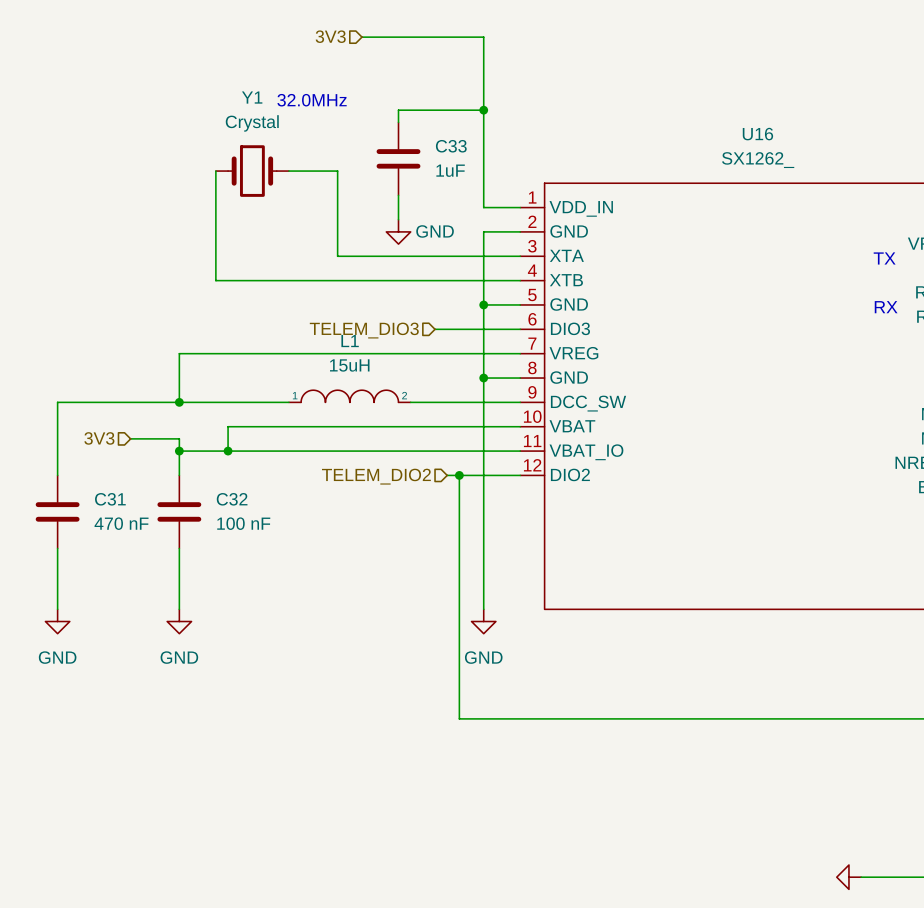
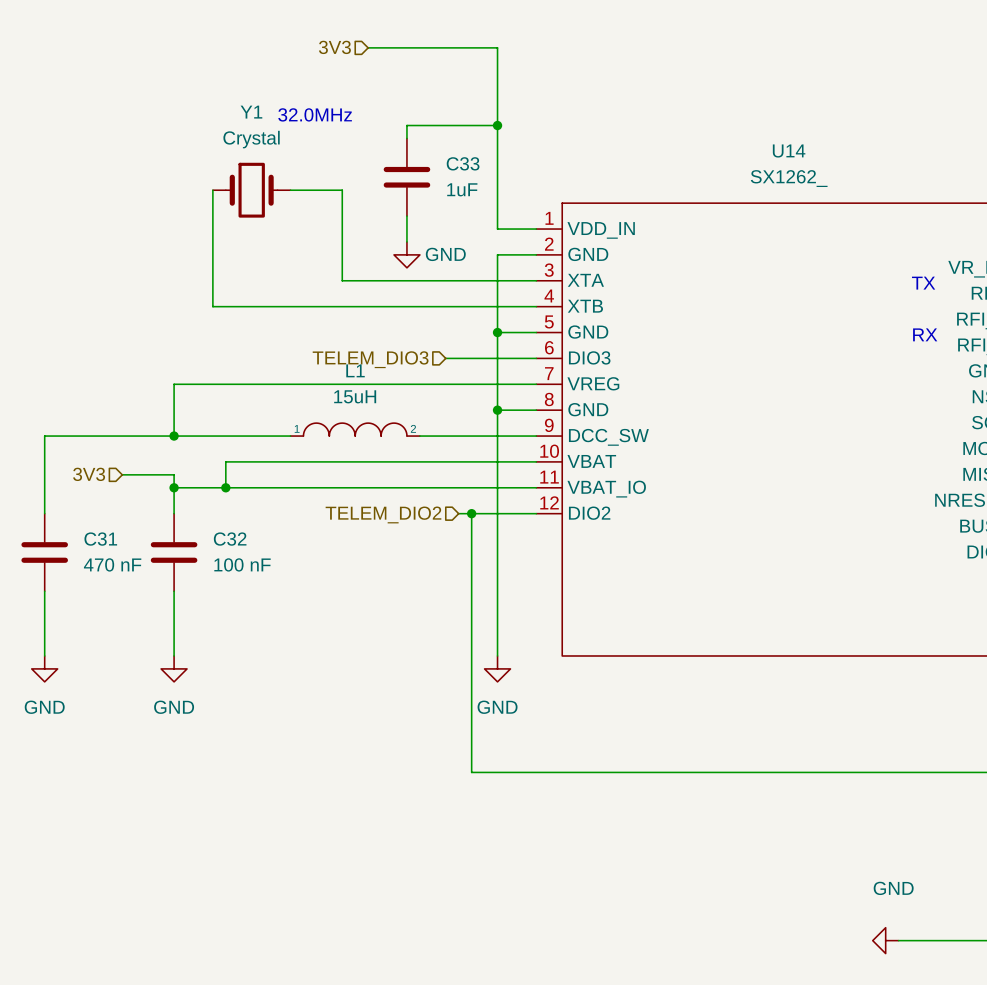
U16 name: U16 (757, 134) -> U14 (789, 151)
power symbol text: none -> GND (893, 888)

